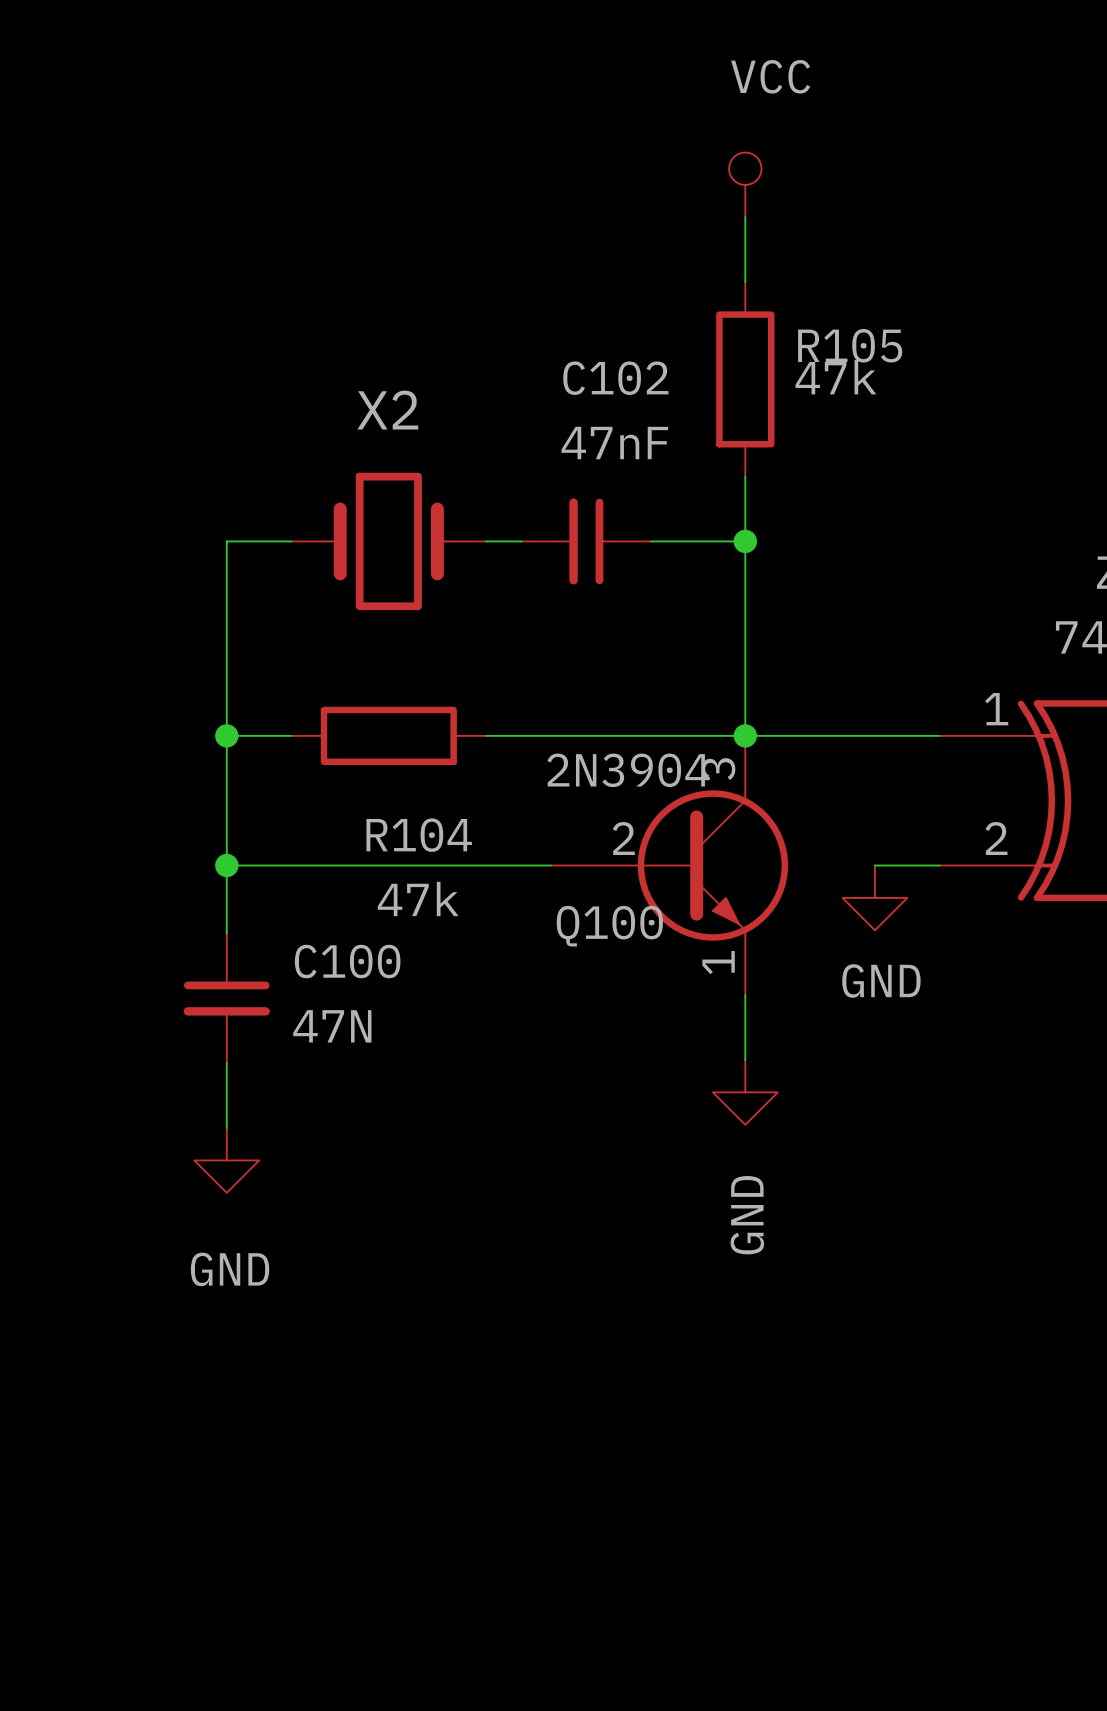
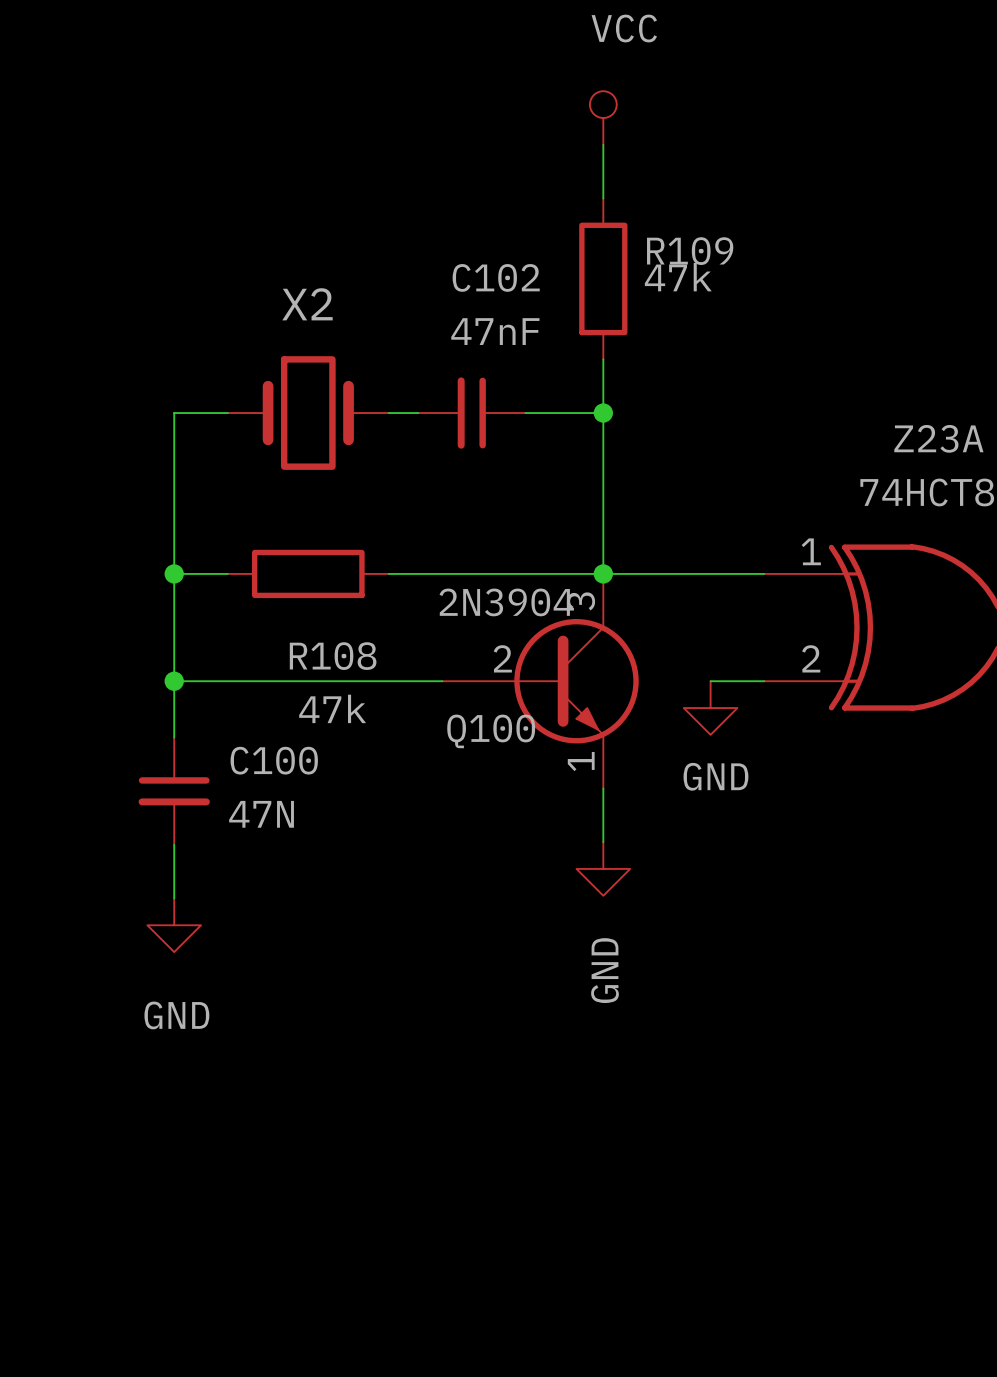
R105 name: R105 (850, 345) -> R109 (690, 251)
R104 name: R104 (419, 835) -> R108 (333, 656)

